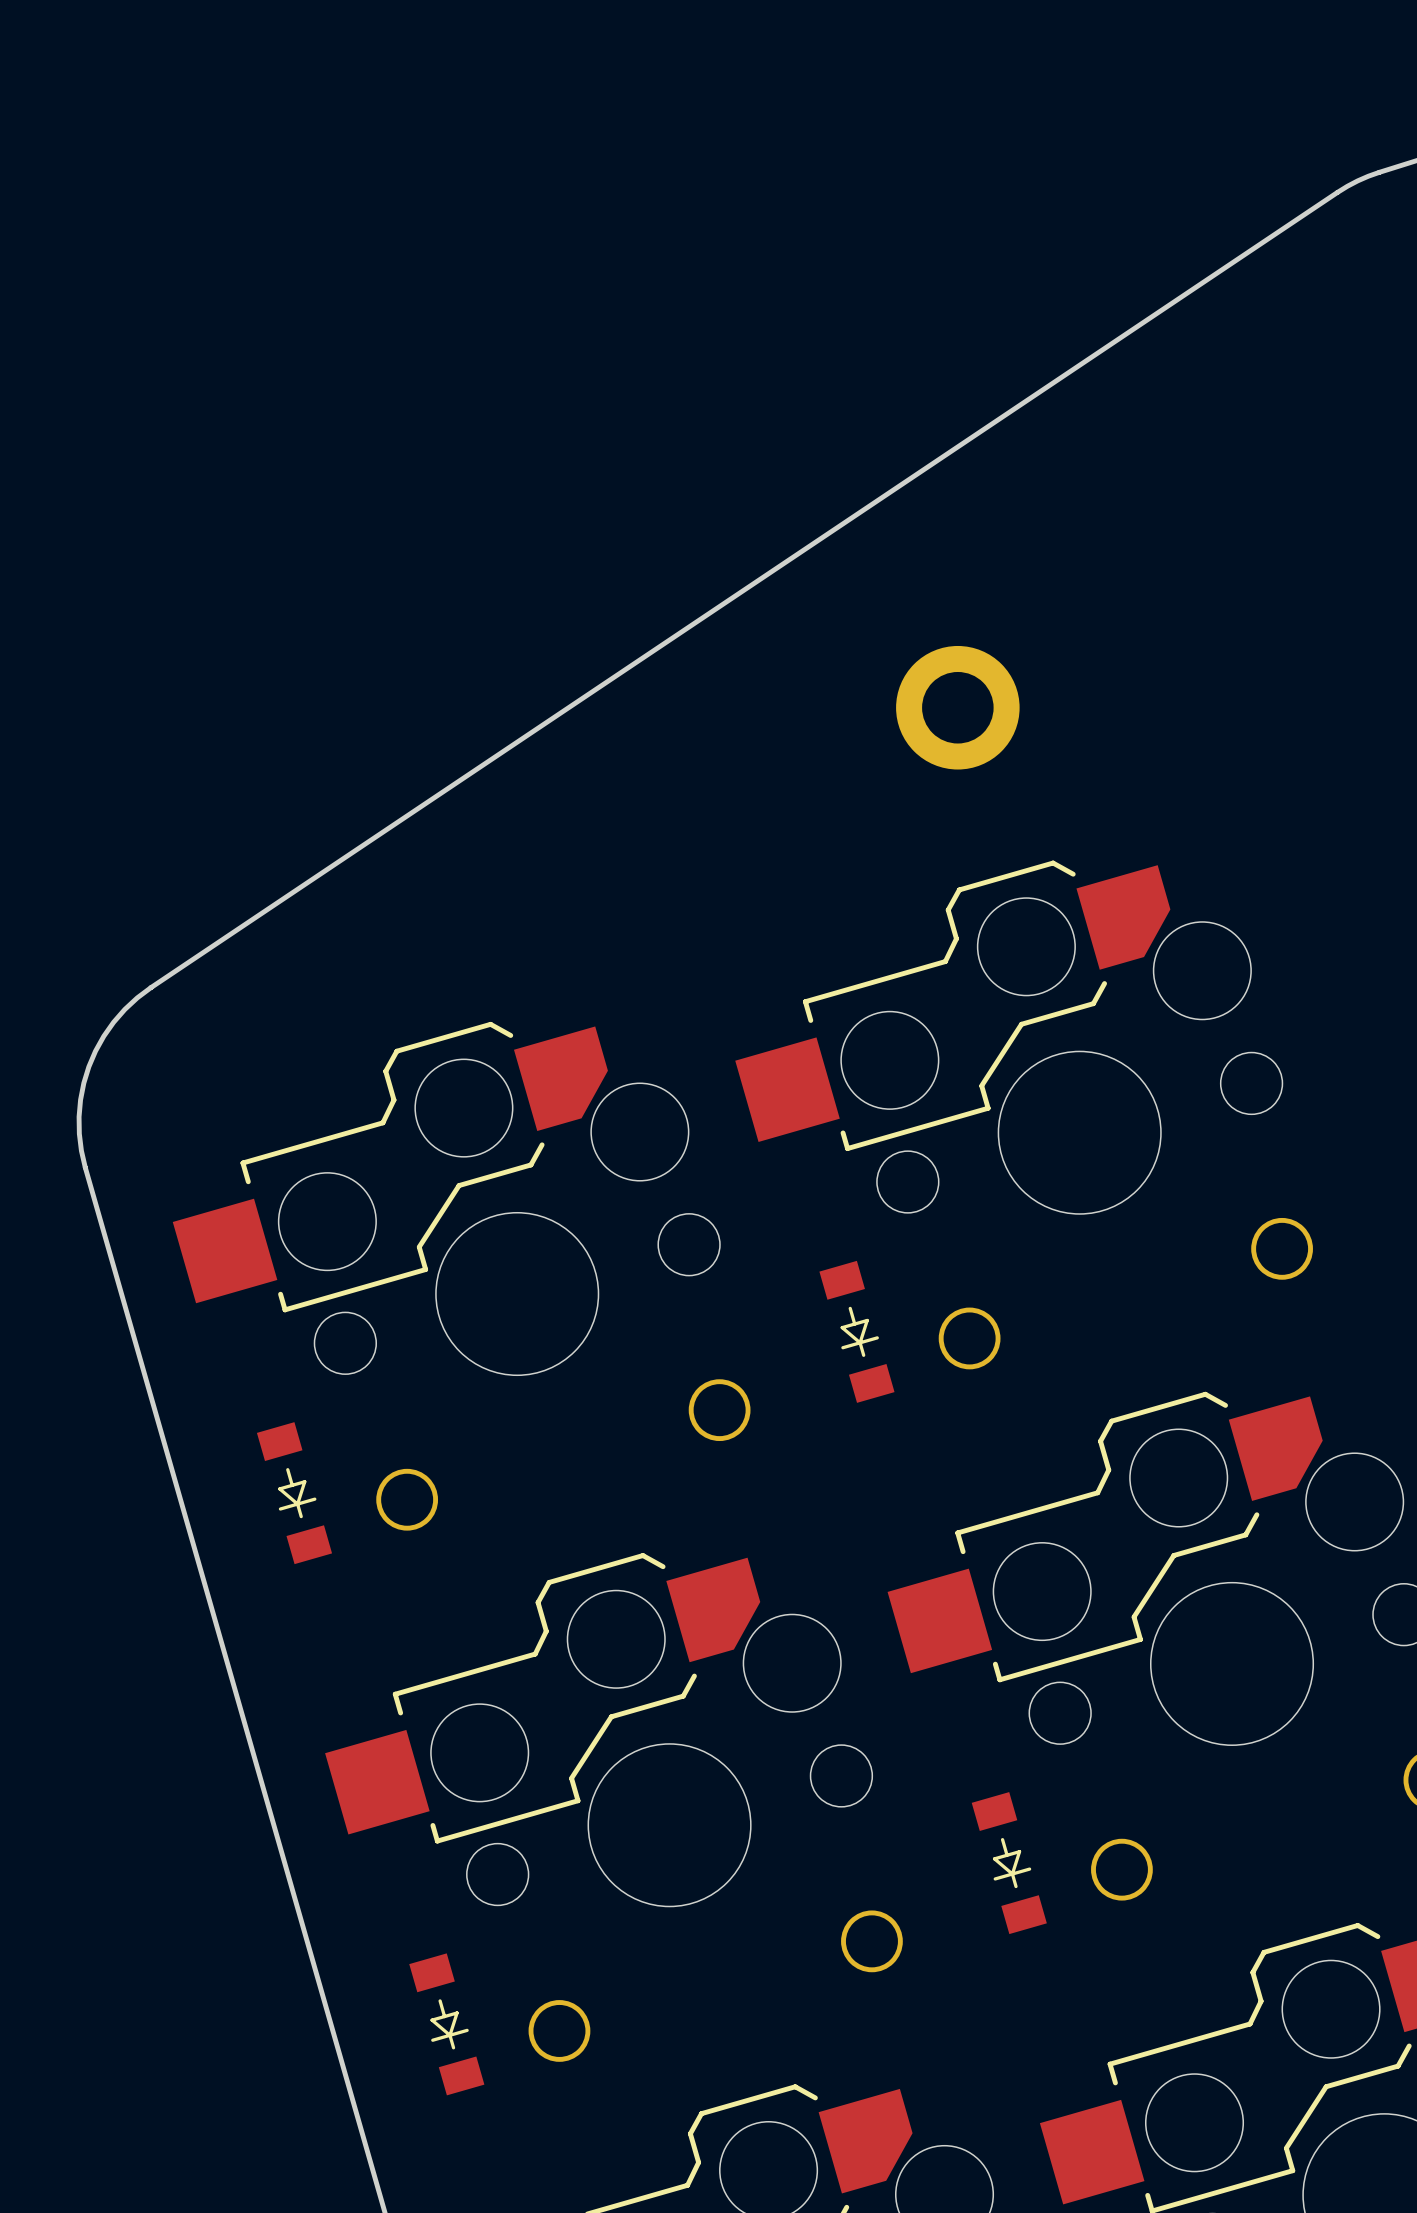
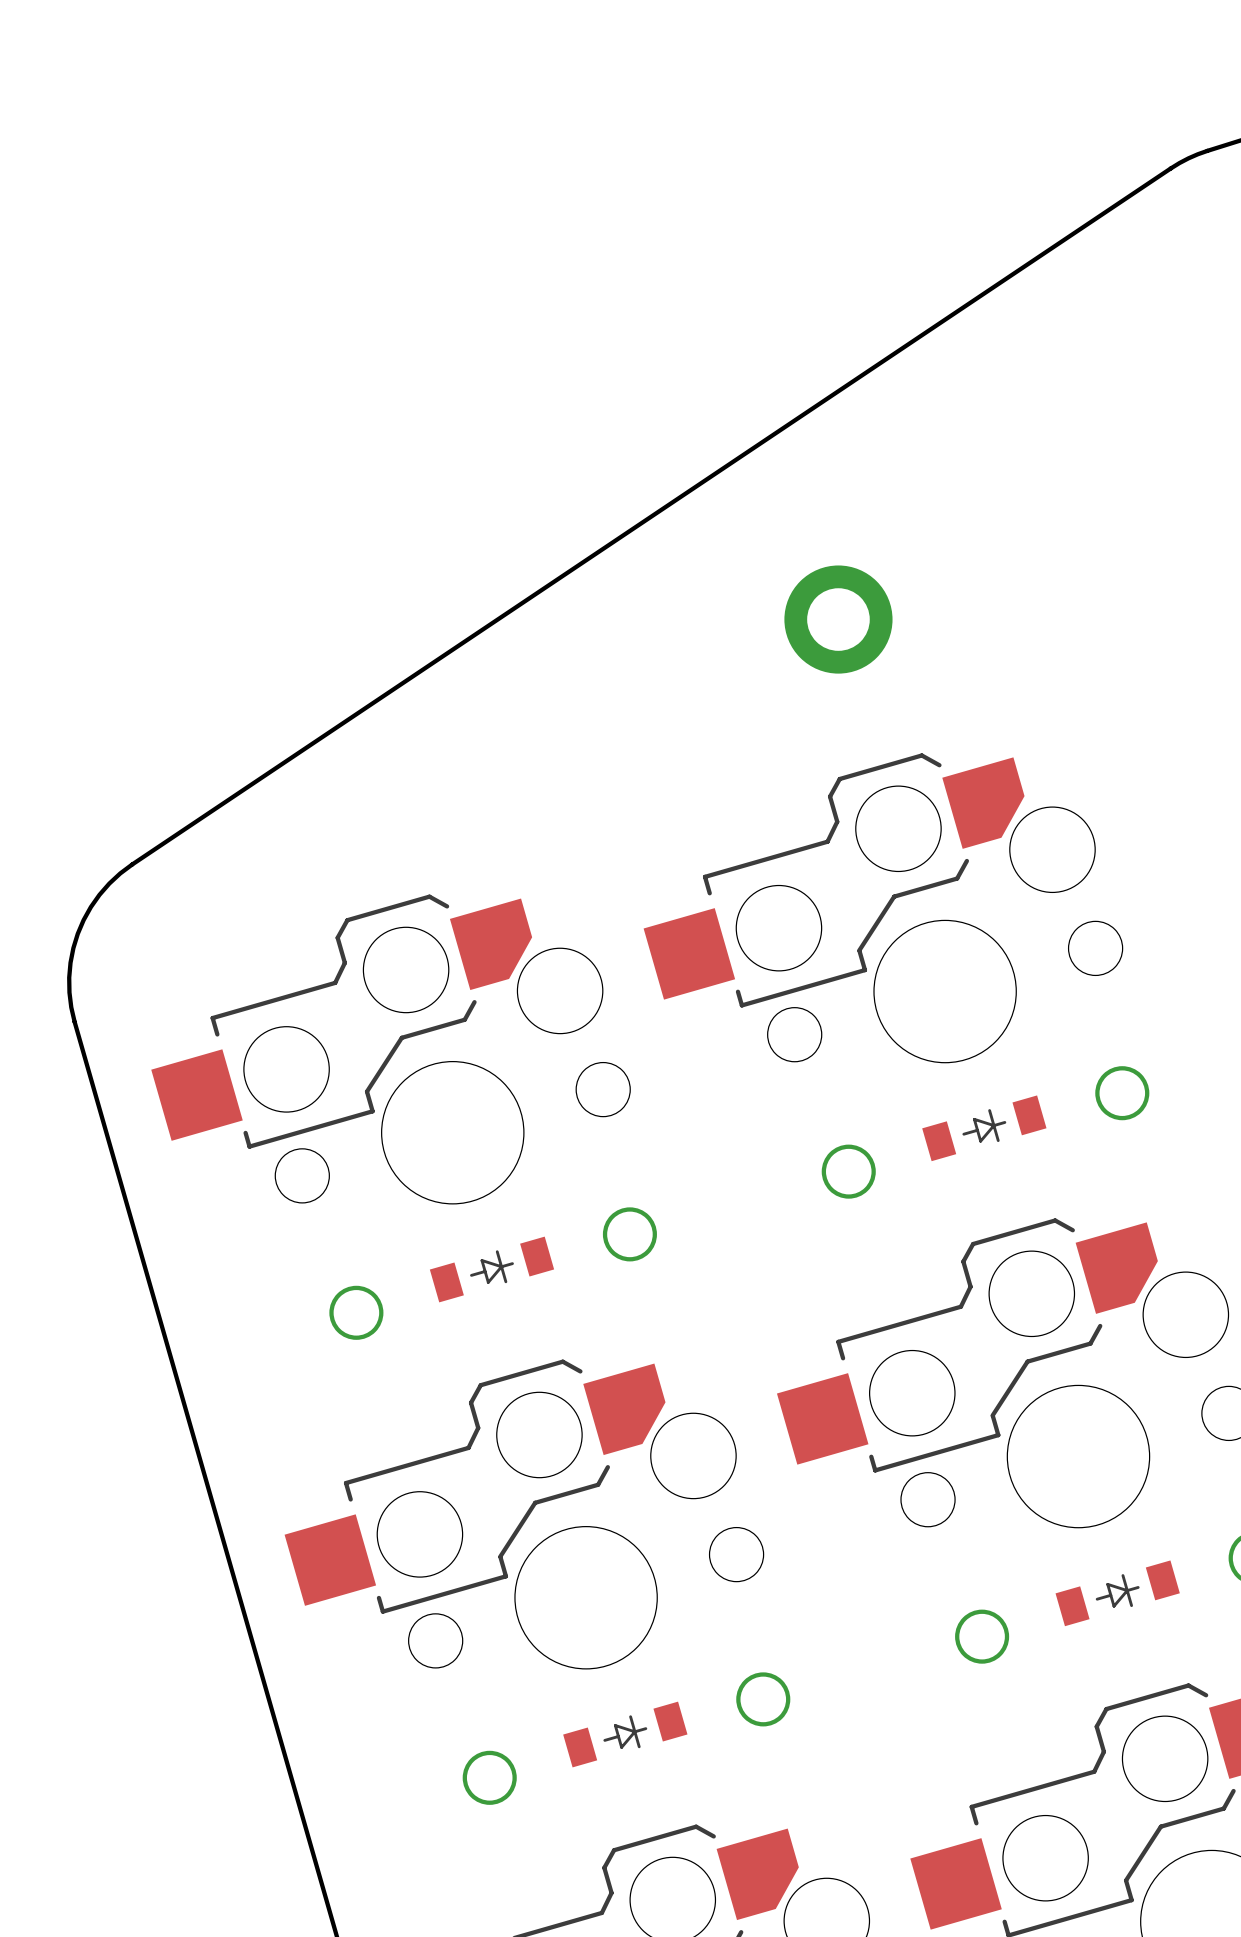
part: none -> (984, 1128)
part: (856, 1331) -> none
part: none -> (491, 1269)
part: (294, 1493) -> none
part: none -> (1117, 1593)
part: (1009, 1863) -> none
part: none -> (625, 1734)
part: (446, 2024) -> none

